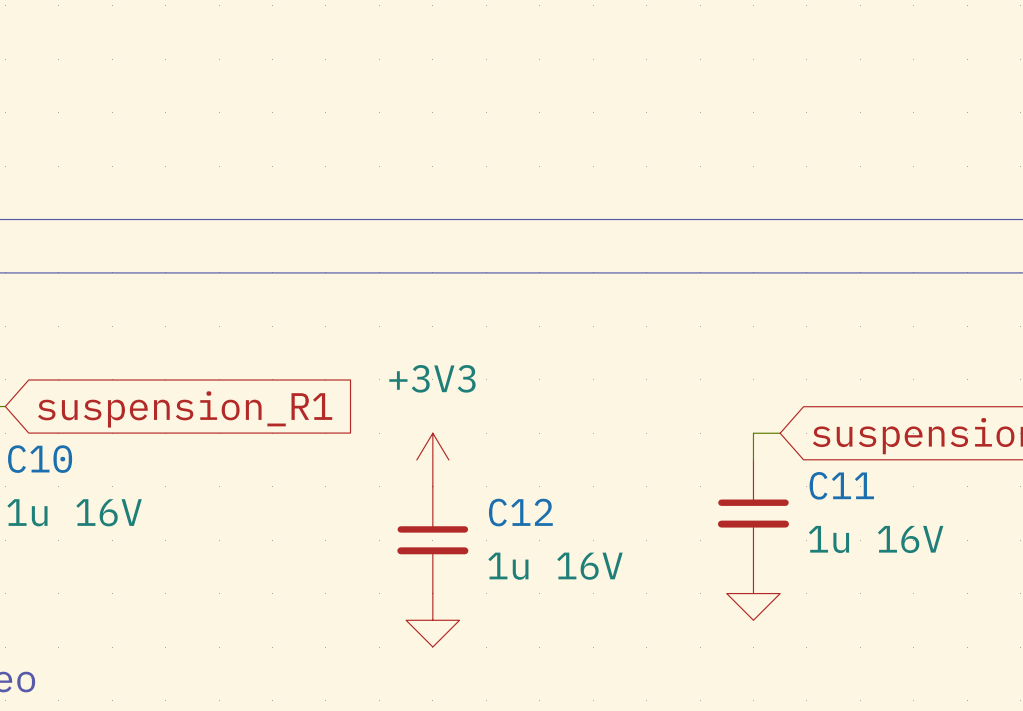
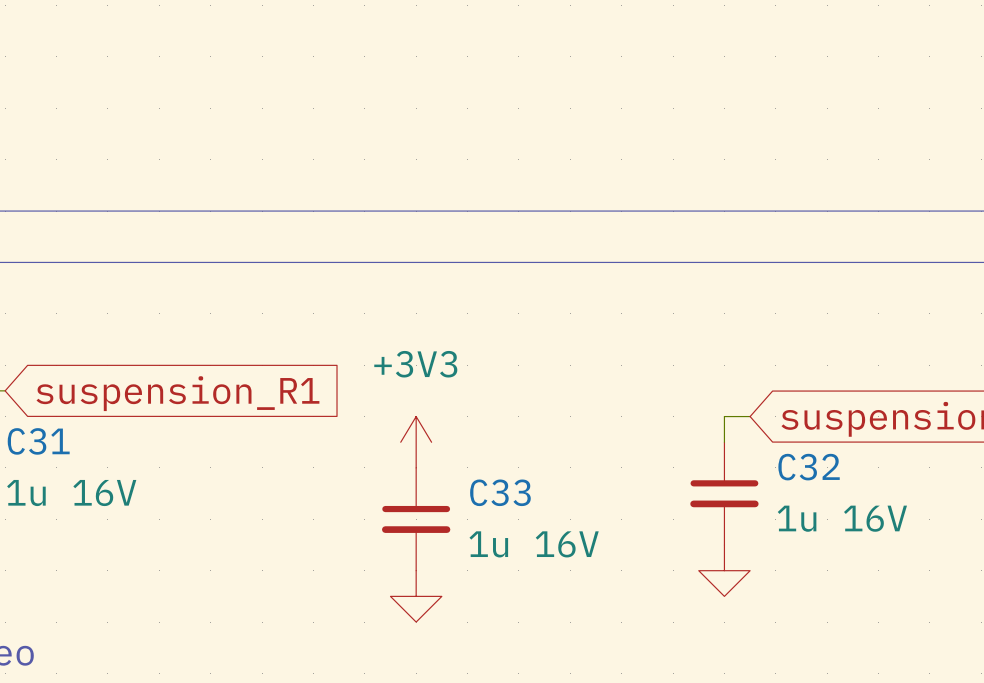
C10 name: C10 (40, 459) -> C31 (38, 441)
C11 name: C11 (841, 485) -> C32 (809, 467)
C12 name: C12 (520, 512) -> C33 (500, 492)

